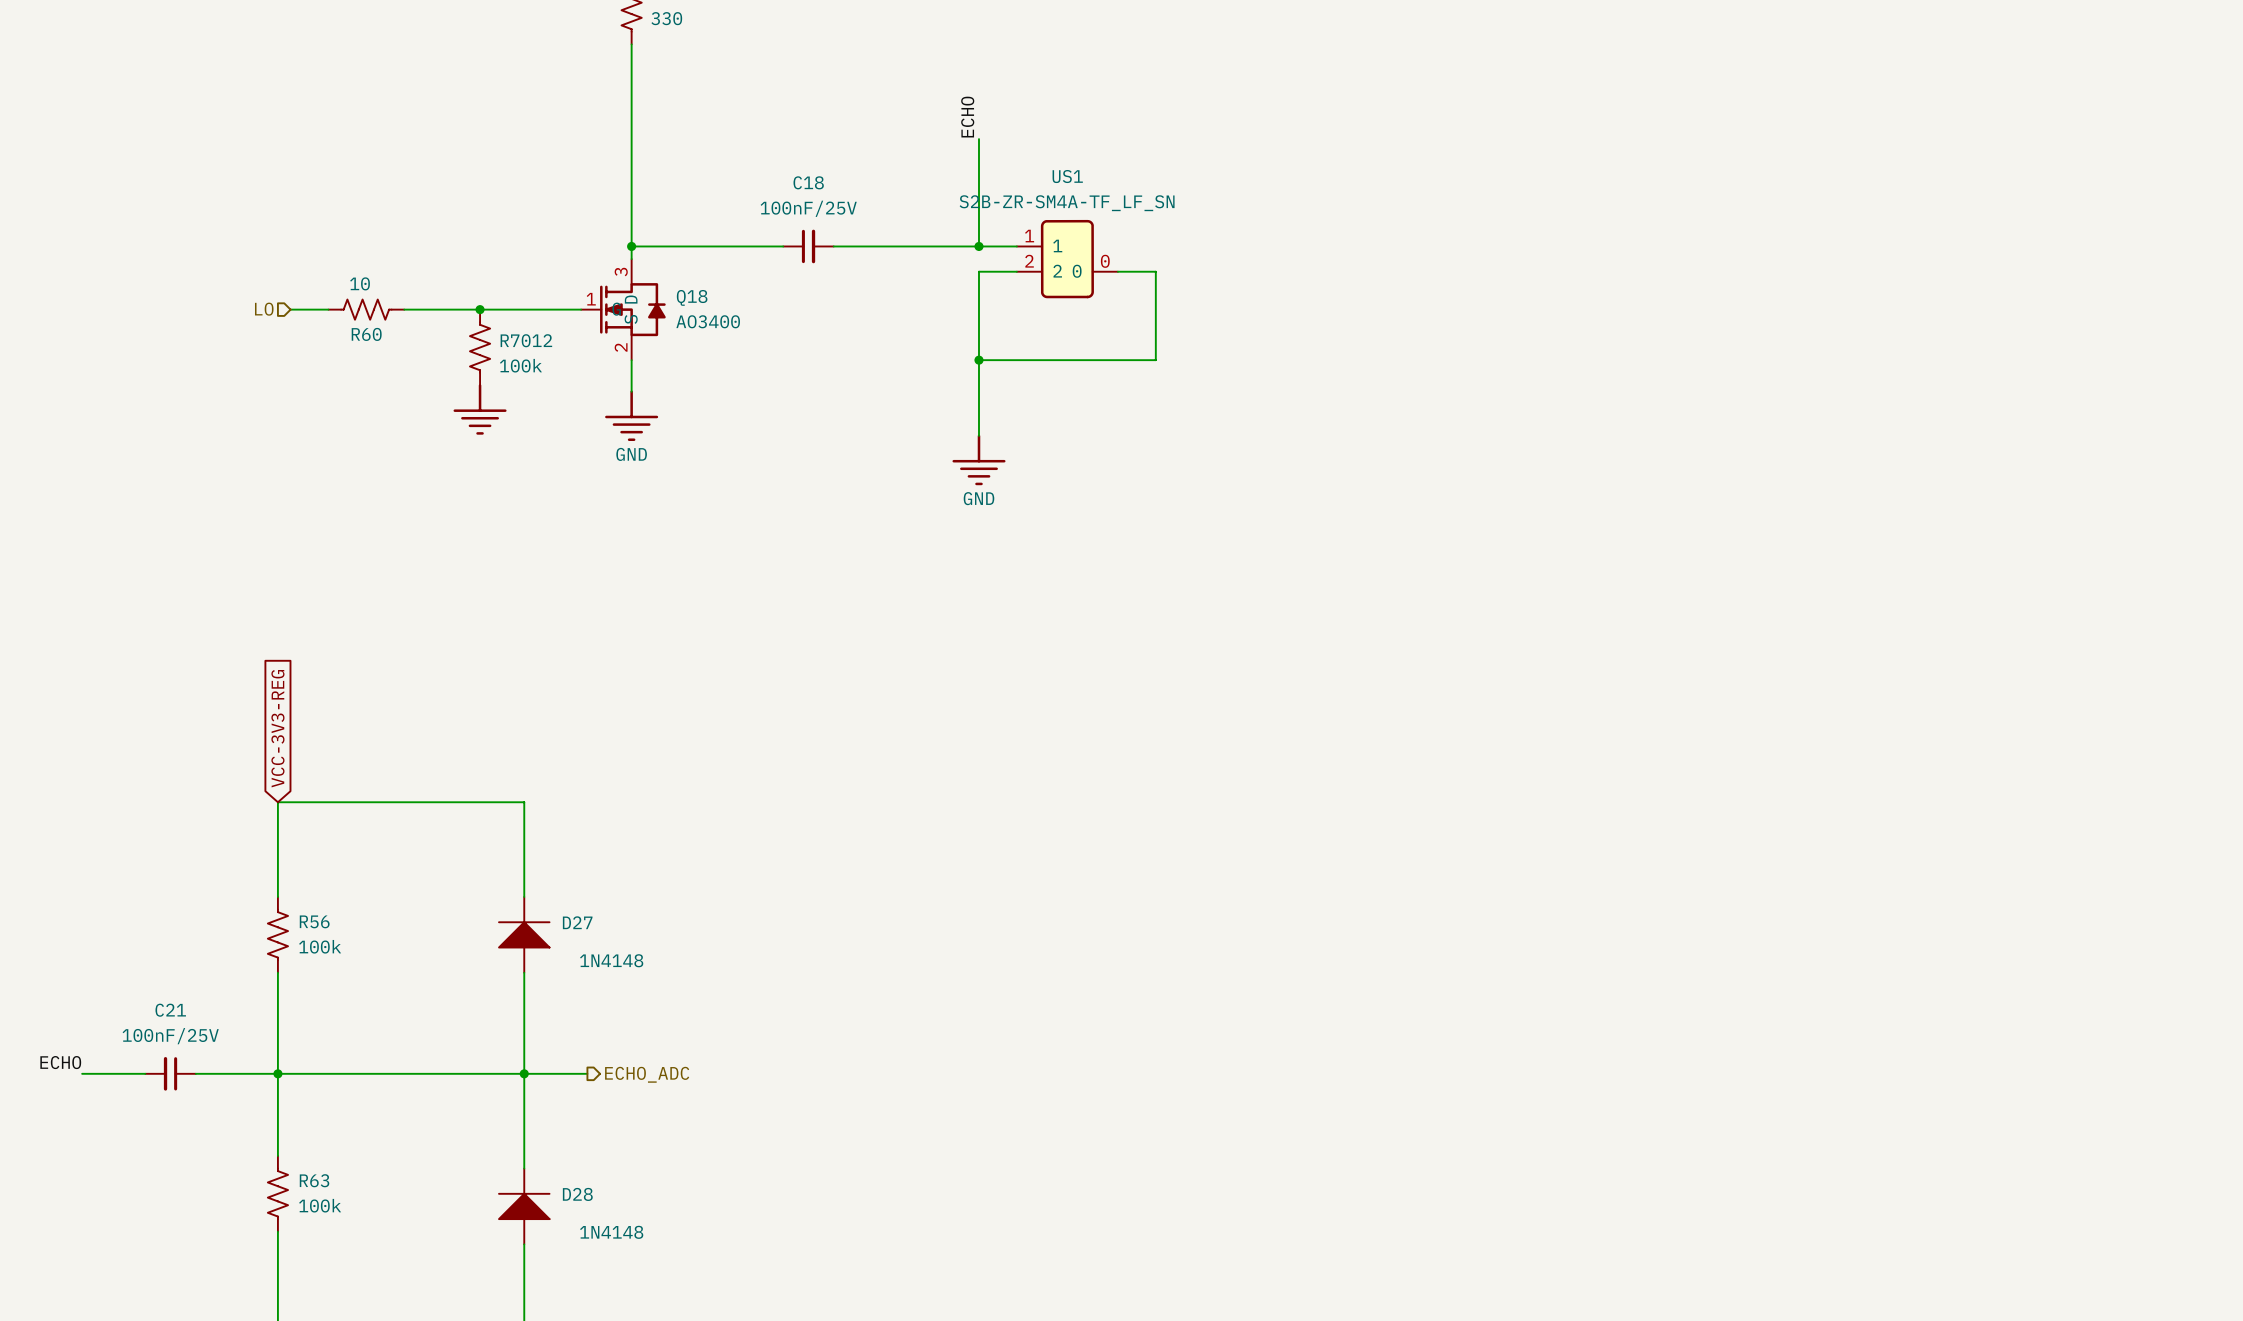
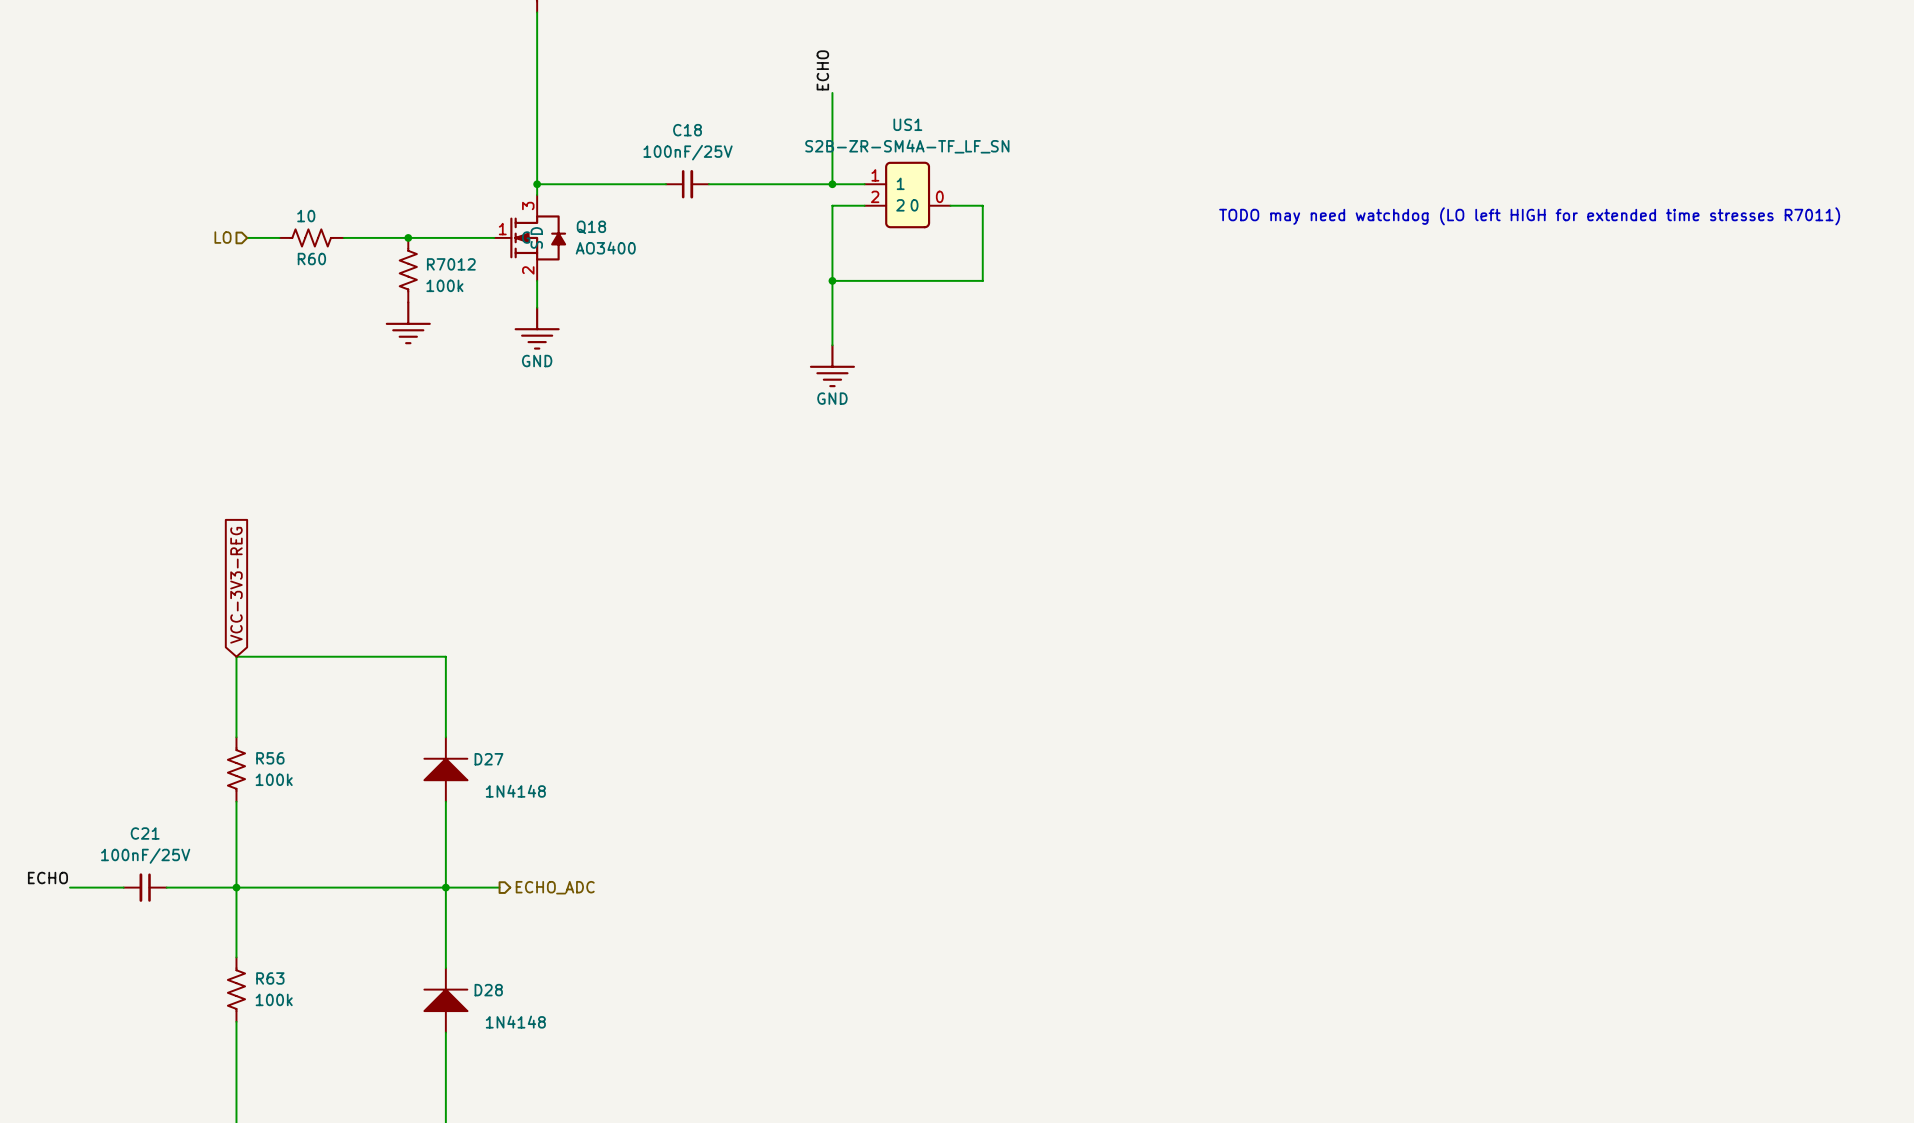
text: none -> TODO may need watchdog (LO left HIGH for extended time stresses R7011) (1529, 216)

